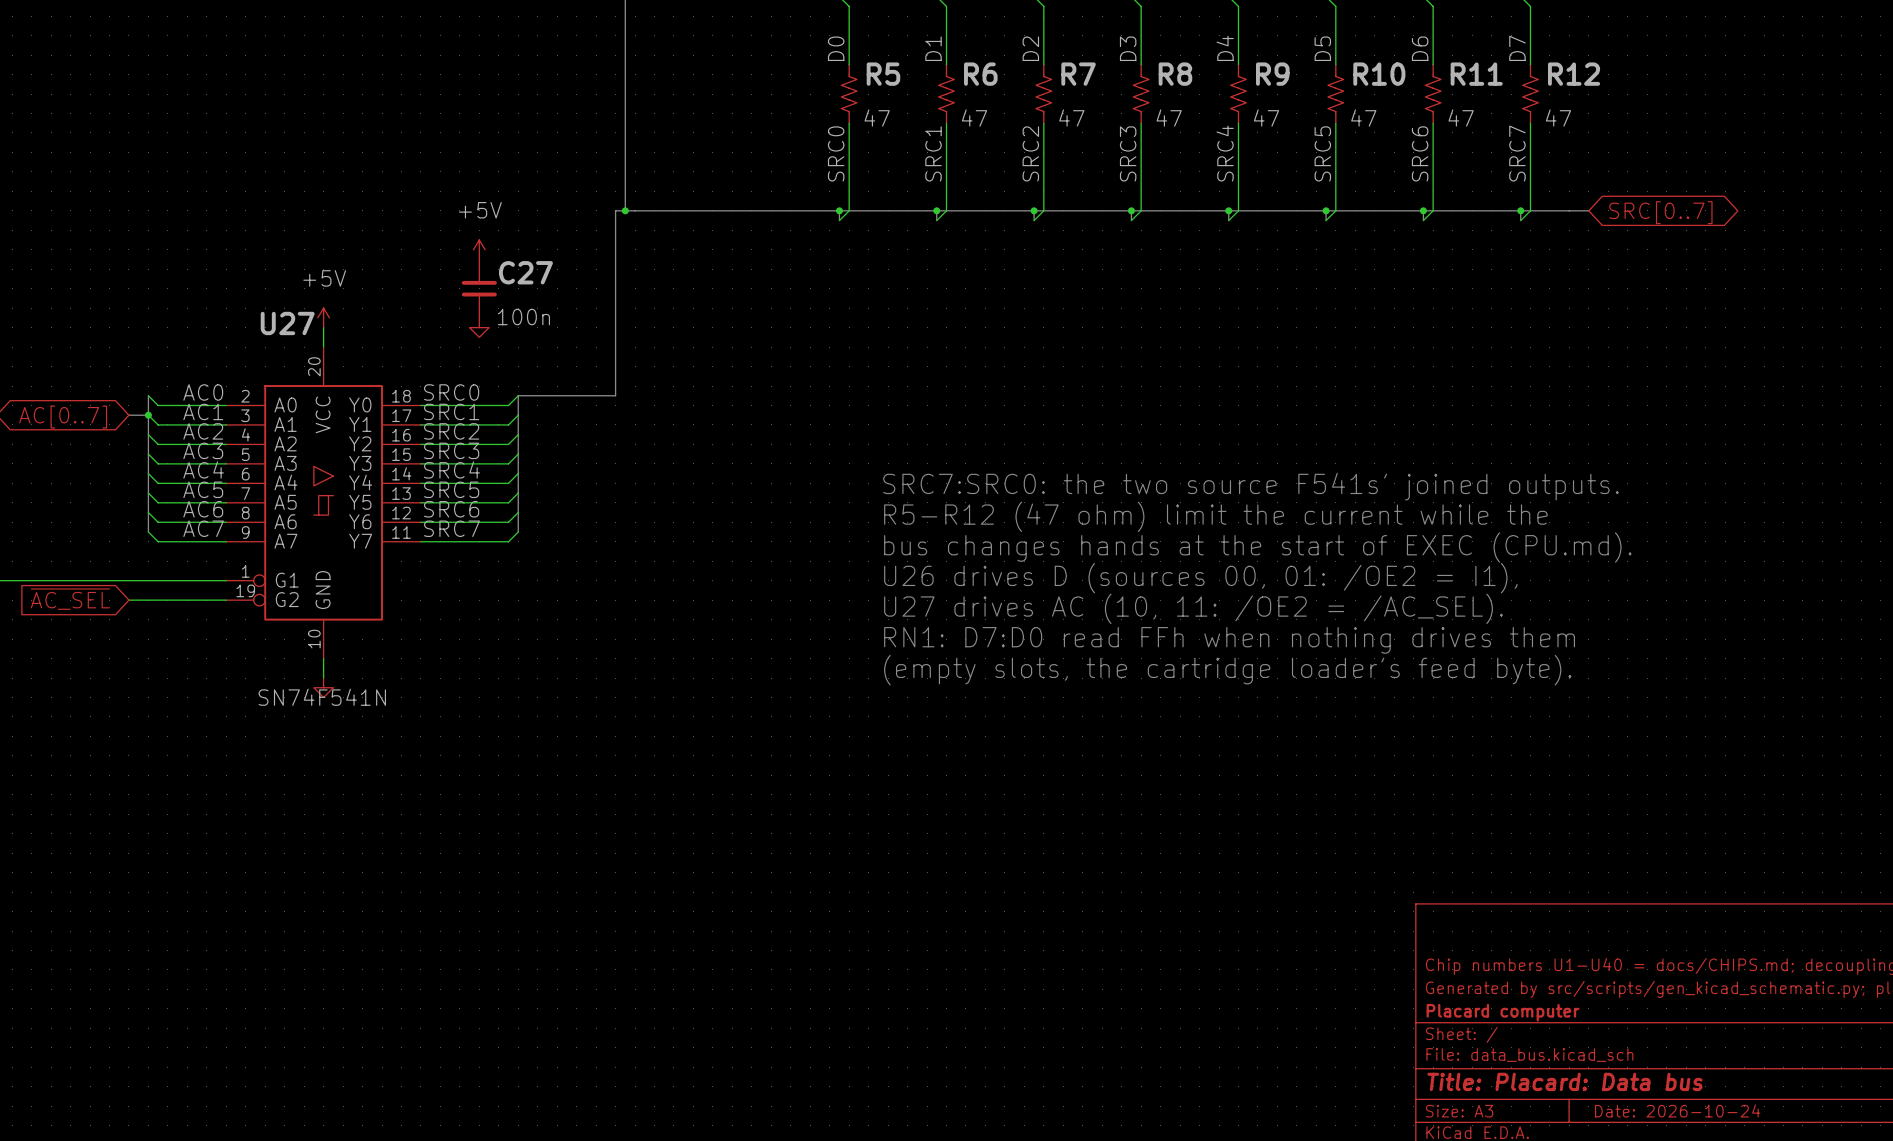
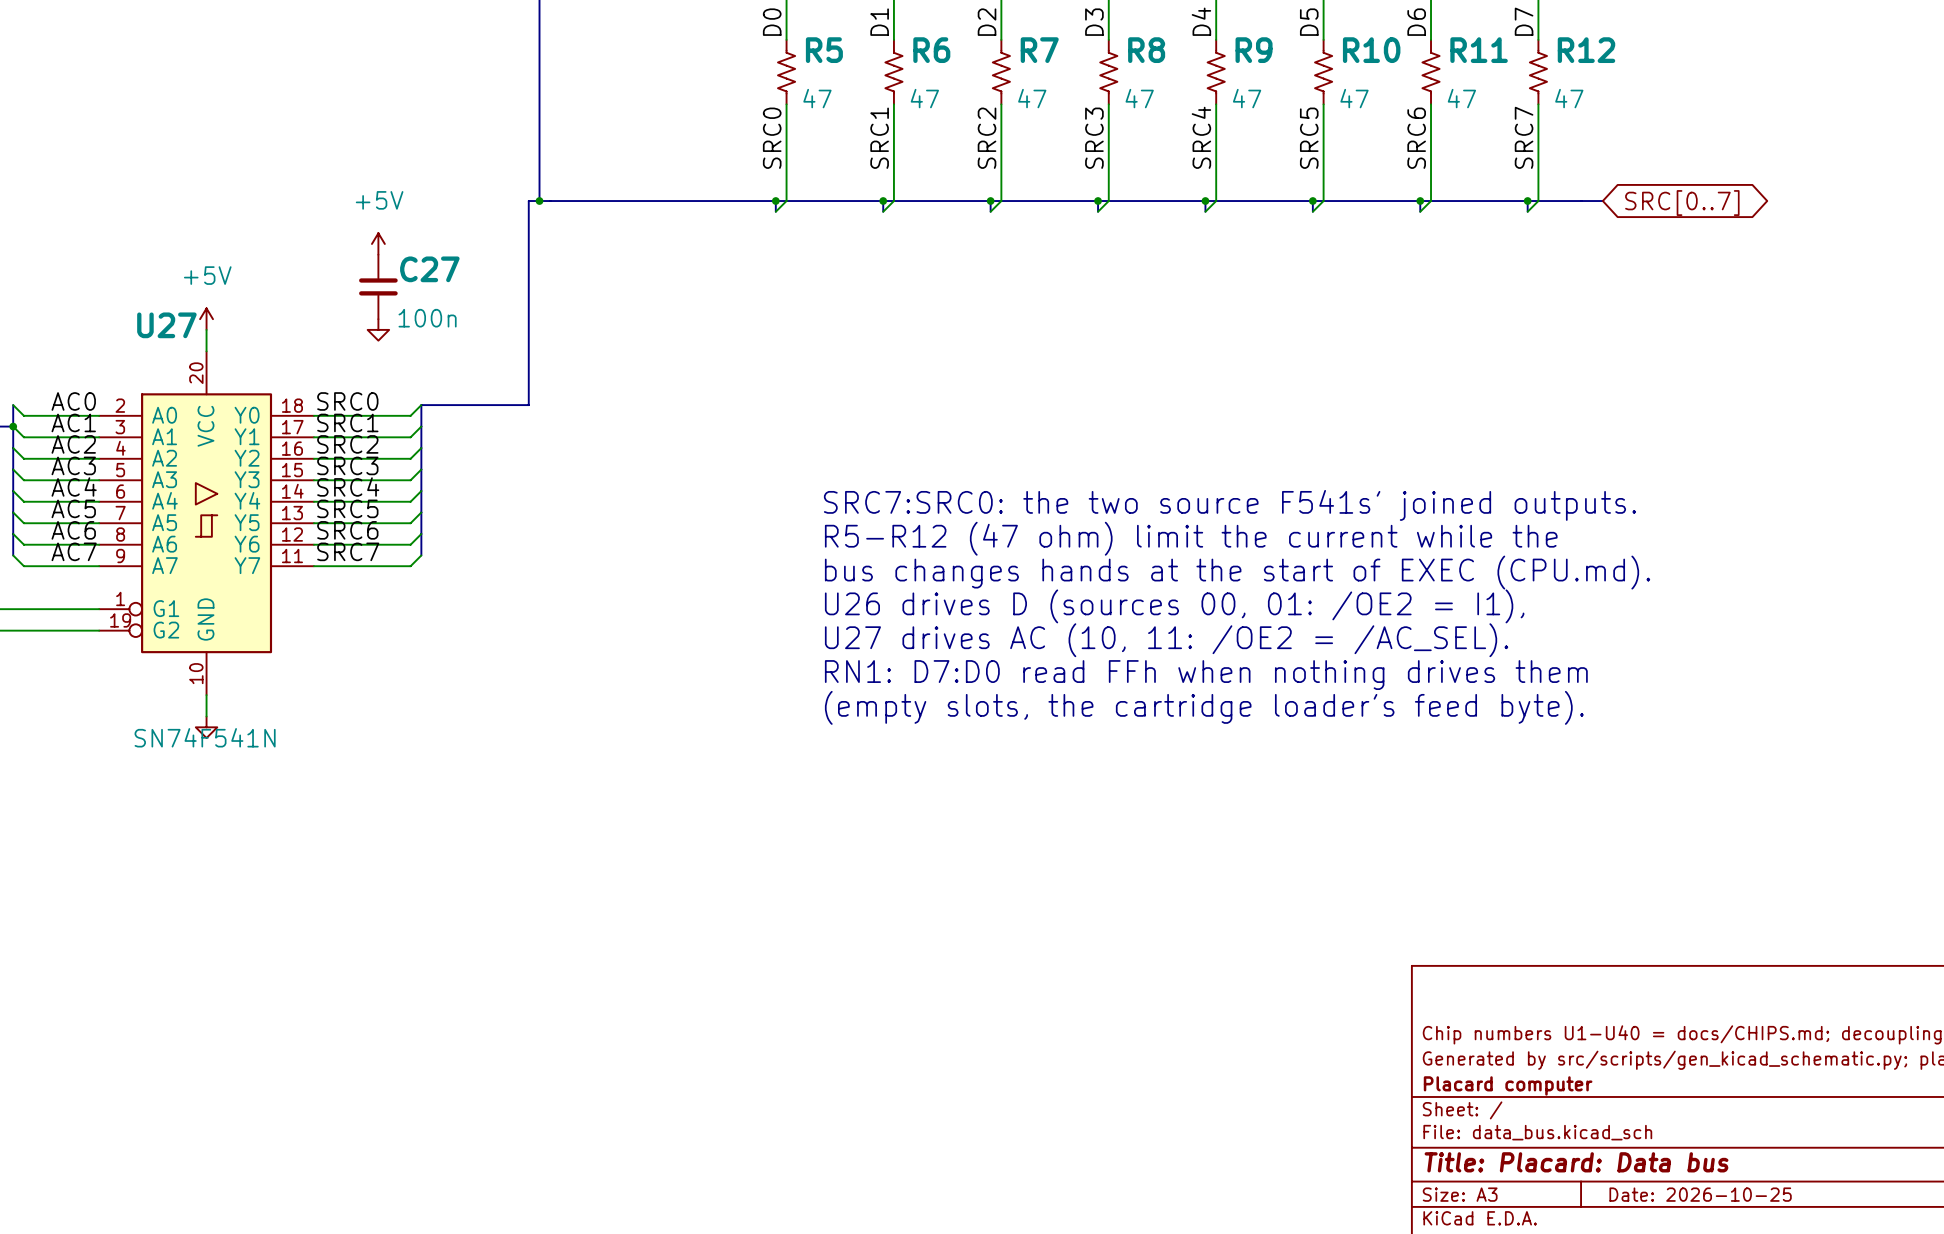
title block: Date: 2026-10-24 (1677, 1110) -> Date: 2026-10-25 (1700, 1194)

